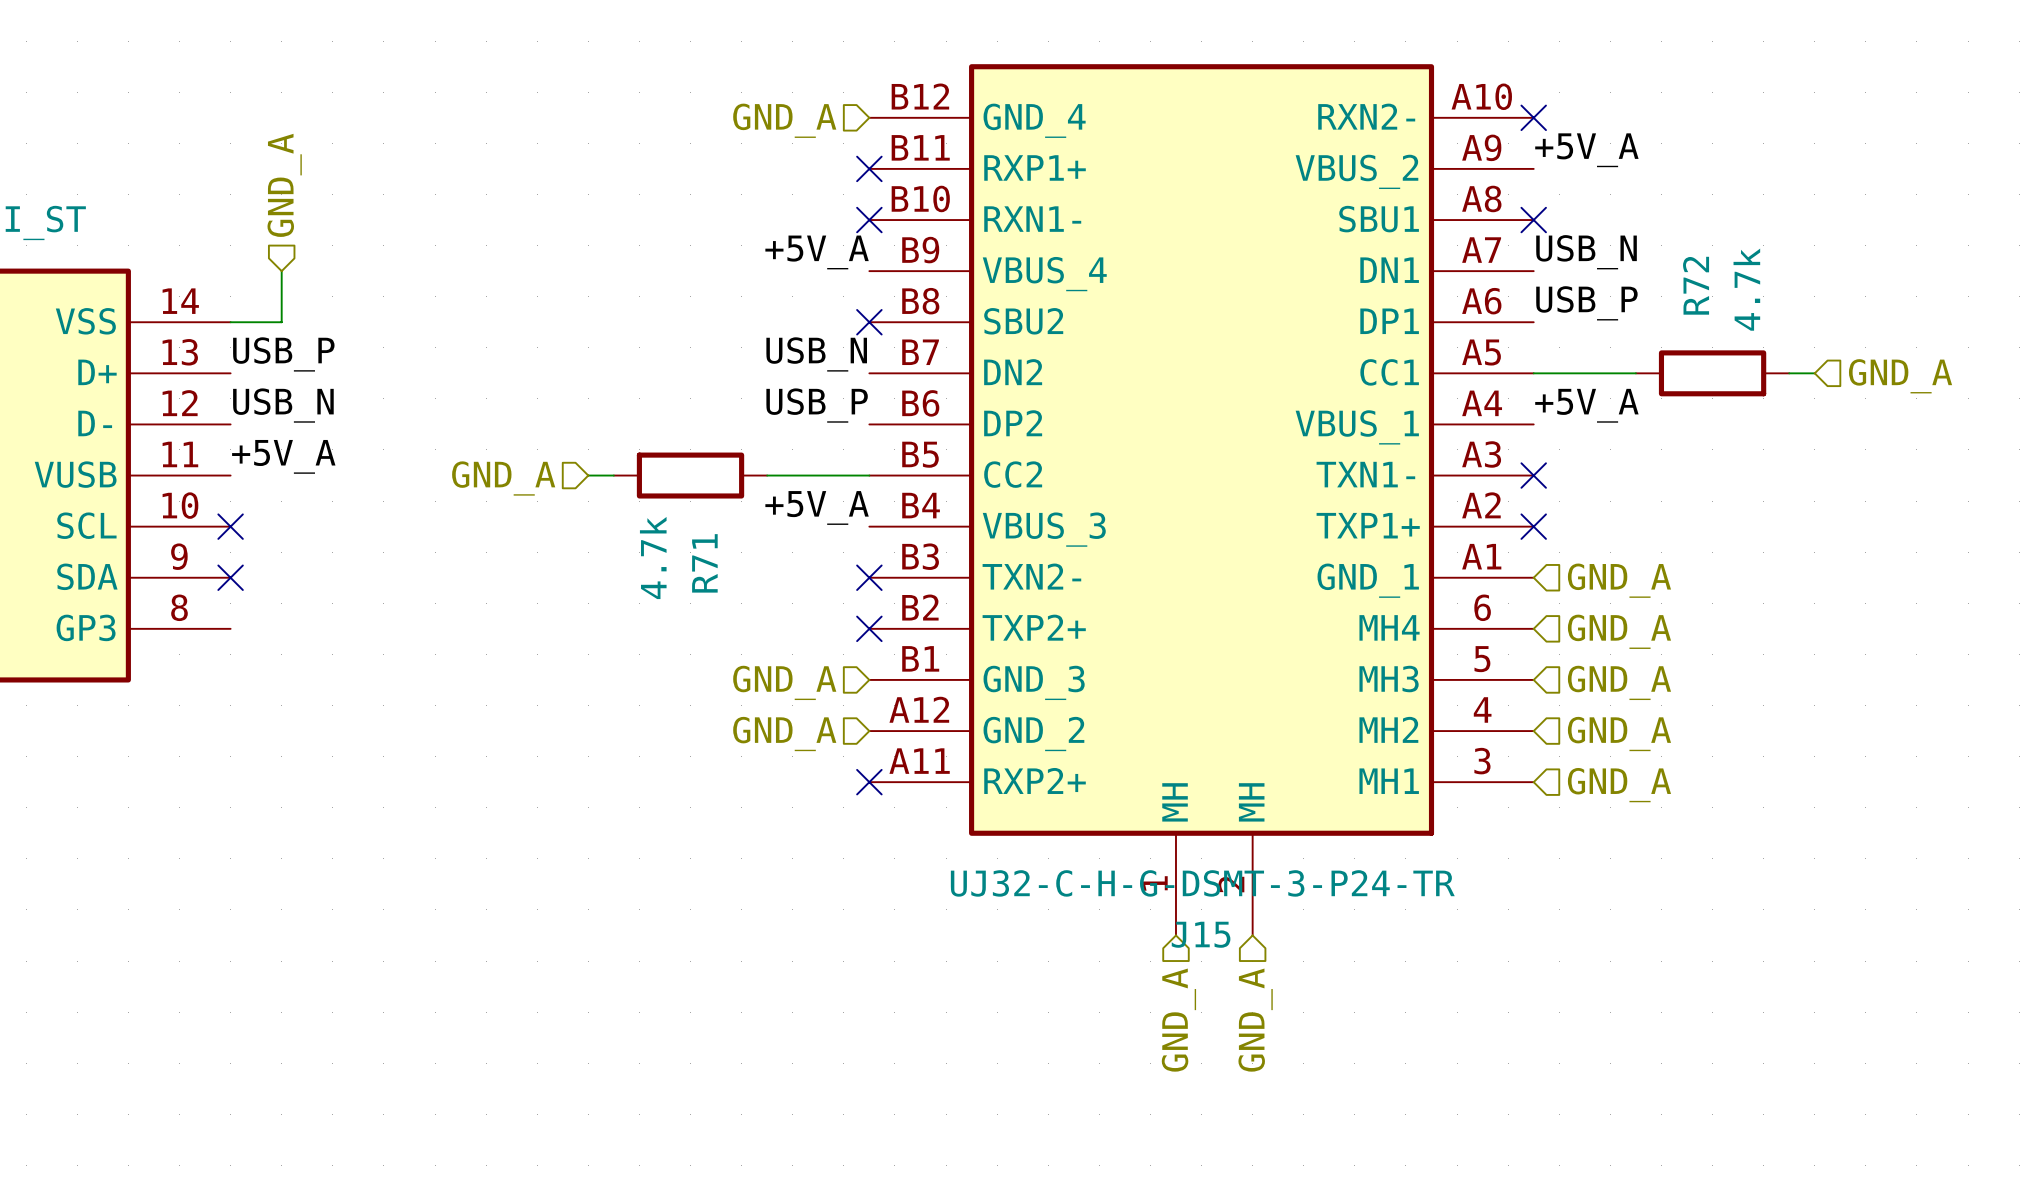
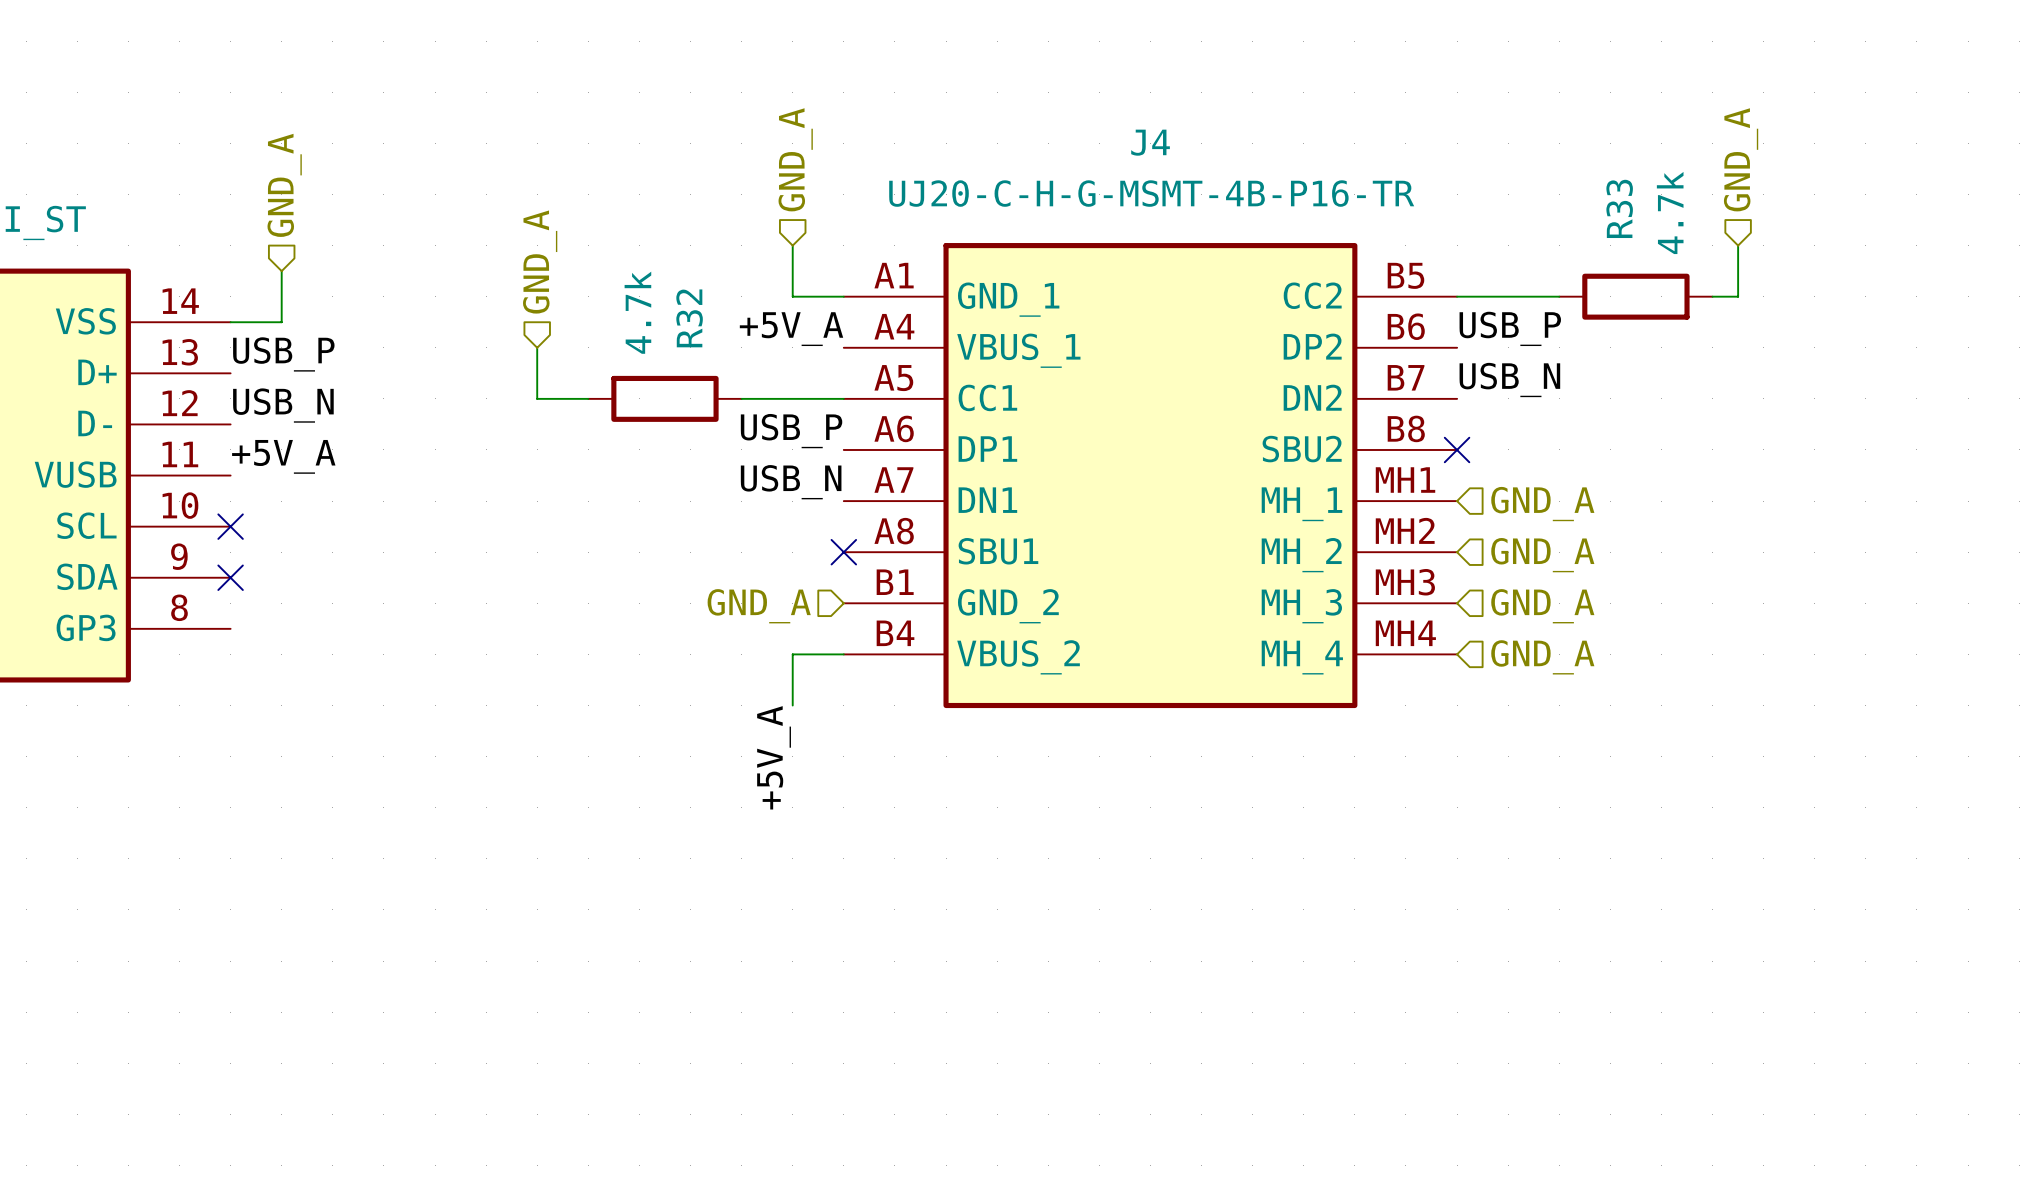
no-connect mark: (1533, 117) -> none
hierarchical label rotation: 0° (784, 120) -> 90° clockwise (795, 159)
label: +5V_A (1586, 150) -> none
hierarchical label: none -> GND_A (1741, 159)
no-connect mark: (869, 168) -> none
no-connect mark: (869, 220) -> none
no-connect mark: (1533, 220) -> none
wire: none -> (792, 245) (792, 296) (843, 296)
wire: none -> (1738, 245) (1738, 296) (1712, 296)
label position: +5V_A (817, 252) -> +5V_A (791, 329)
label position: USB_N (1586, 252) -> USB_N (1509, 379)
hierarchical label: none -> GND_A (540, 262)
R33: none -> 4.7k (1635, 296)
label position: USB_P (1586, 303) -> USB_P (1510, 328)
no-connect mark: (869, 322) -> none
wire: none -> (537, 347) (537, 398) (588, 398)
label position: USB_N (816, 354) -> USB_N (791, 482)
wire: (1533, 373) (1635, 373) -> (1457, 296) (1559, 296)
R72: 4.7k (1712, 373) -> none
wire: (1789, 373) (1814, 373) -> none
hierarchical label: GND_A (1900, 376) -> none
R32: none -> 4.7k (664, 398)
label position: USB_P (817, 405) -> USB_P (791, 431)
label: +5V_A (1586, 405) -> none
no-connect mark: none -> (1457, 449)
wire: (588, 475) (613, 475) -> none
R71: 4.7k (690, 475) -> none
wire: (767, 475) (869, 475) -> (741, 398) (843, 398)
J4: none -> UJ20-C-H-G-MSMT-4B-P16-TR (1150, 475)
no-connect mark: (1533, 475) -> none
hierarchical label: GND_A (503, 478) -> none
J15: UJ32-C-H-G-DSMT-3-P24-TR (1201, 499) -> none
hierarchical label: none -> GND_A (1542, 504)
label: +5V_A (817, 507) -> none
no-connect mark: (1533, 526) -> none
hierarchical label: none -> GND_A (1542, 555)
no-connect mark position: (869, 577) -> (843, 552)
hierarchical label: GND_A (1619, 580) -> none
hierarchical label: none -> GND_A (759, 606)
hierarchical label: none -> GND_A (1542, 606)
no-connect mark: (869, 628) -> none
hierarchical label: GND_A (1619, 631) -> none
wire: none -> (843, 654) (792, 654) (792, 705)
hierarchical label: none -> GND_A (1542, 657)
hierarchical label: GND_A (784, 682) -> none
hierarchical label: GND_A (1619, 682) -> none
hierarchical label: GND_A (784, 734) -> none
hierarchical label: GND_A (1619, 734) -> none
label: none -> +5V_A (774, 757)
no-connect mark: (869, 782) -> none
hierarchical label: GND_A (1619, 785) -> none
hierarchical label: GND_A (1178, 1020) -> none
hierarchical label: GND_A (1255, 1020) -> none

